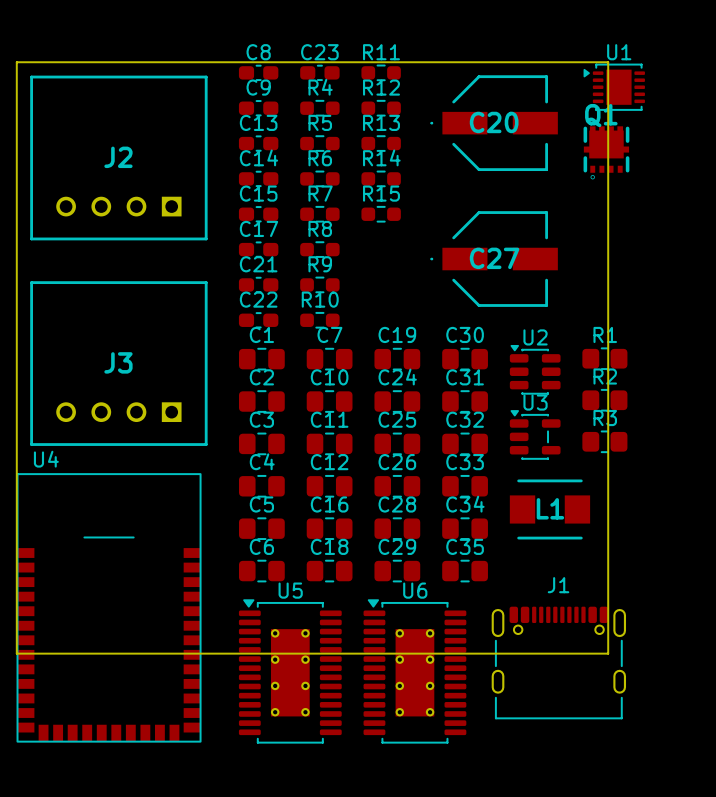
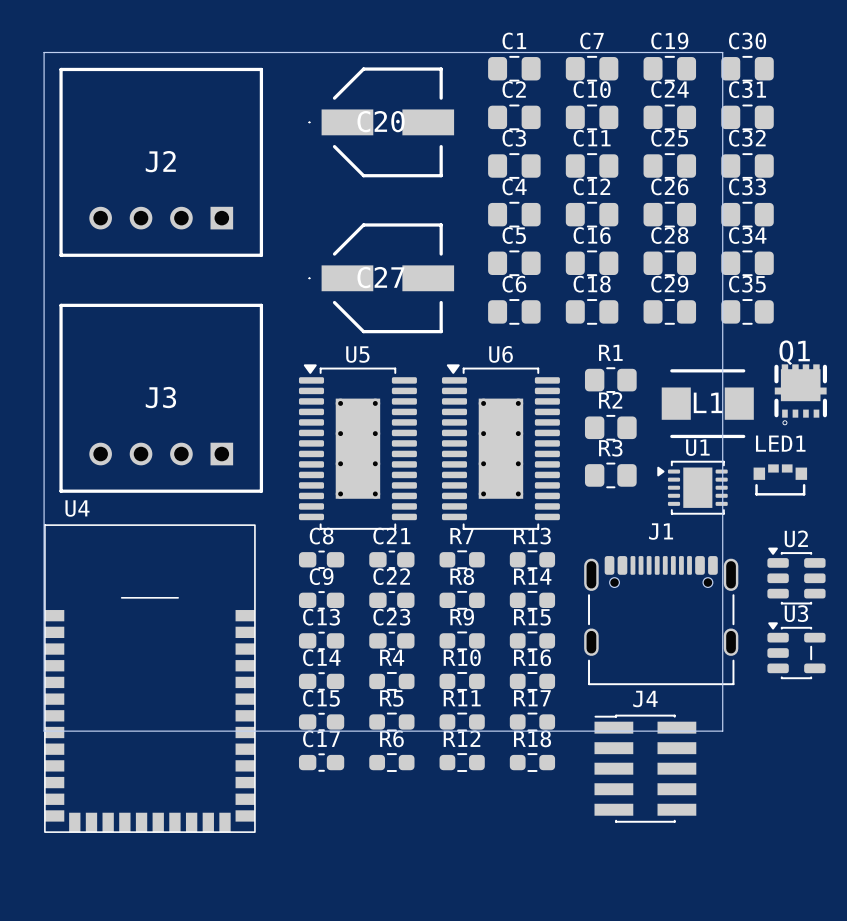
C8 position: (258, 72) -> (321, 559)
C23 position: (319, 72) -> (391, 640)
R11 position: (381, 72) -> (462, 722)
U1 position: (614, 87) -> (692, 487)
C9 position: (258, 108) -> (321, 600)
R4 position: (319, 108) -> (391, 681)
R12 position: (381, 108) -> (462, 762)
C20 position: (494, 123) -> (381, 122)
C13 position: (258, 143) -> (321, 640)
R5 position: (319, 143) -> (391, 722)
R13 position: (381, 143) -> (532, 559)
Q1 position: (606, 152) -> (800, 394)
C14 position: (258, 178) -> (321, 681)
R6 position: (319, 178) -> (391, 762)
R14 position: (381, 178) -> (532, 600)
C15 position: (258, 214) -> (321, 722)
R7 position: (319, 214) -> (462, 559)
R15 position: (381, 214) -> (532, 640)
C17 position: (258, 249) -> (321, 762)
R8 position: (319, 249) -> (462, 600)
C27 position: (494, 259) -> (381, 278)
C21 position: (258, 284) -> (391, 559)
R9 position: (319, 284) -> (462, 640)
C22 position: (258, 320) -> (391, 600)
R10 position: (319, 320) -> (462, 681)
R1 position: (604, 358) -> (610, 380)
C1 position: (261, 359) -> (514, 68)
C7 position: (329, 359) -> (592, 68)
C19 position: (397, 359) -> (669, 68)
C30 position: (465, 359) -> (747, 68)
U2 position: (535, 369) -> (796, 576)
R2 position: (604, 400) -> (610, 427)
C2 position: (261, 401) -> (514, 117)
C10 position: (329, 401) -> (592, 117)
C24 position: (397, 401) -> (669, 117)
C31 position: (465, 401) -> (747, 117)
U3 position: (535, 434) -> (796, 650)
LED1: none -> (780, 479)
R3 position: (604, 441) -> (610, 475)
C3 position: (261, 443) -> (514, 166)
C11 position: (329, 443) -> (592, 166)
C25 position: (397, 443) -> (669, 166)
C32 position: (465, 443) -> (747, 166)
C4 position: (261, 486) -> (514, 214)
C12 position: (329, 486) -> (592, 214)
C26 position: (397, 486) -> (669, 214)
C33 position: (465, 486) -> (747, 214)
L1 position: (549, 509) -> (707, 403)
C5 position: (261, 528) -> (514, 263)
C16 position: (329, 528) -> (592, 263)
C28 position: (397, 528) -> (669, 263)
C34 position: (465, 528) -> (747, 263)
C6 position: (261, 571) -> (514, 311)
C18 position: (329, 571) -> (592, 311)
C29 position: (397, 571) -> (669, 311)
C35 position: (465, 571) -> (747, 311)
R16: none -> (532, 681)
R17: none -> (532, 722)
J1 position: (558, 662) -> (661, 620)
U5 position: (290, 671) -> (357, 447)
U6 position: (414, 671) -> (500, 447)
R18: none -> (532, 762)
J4: none -> (645, 768)

